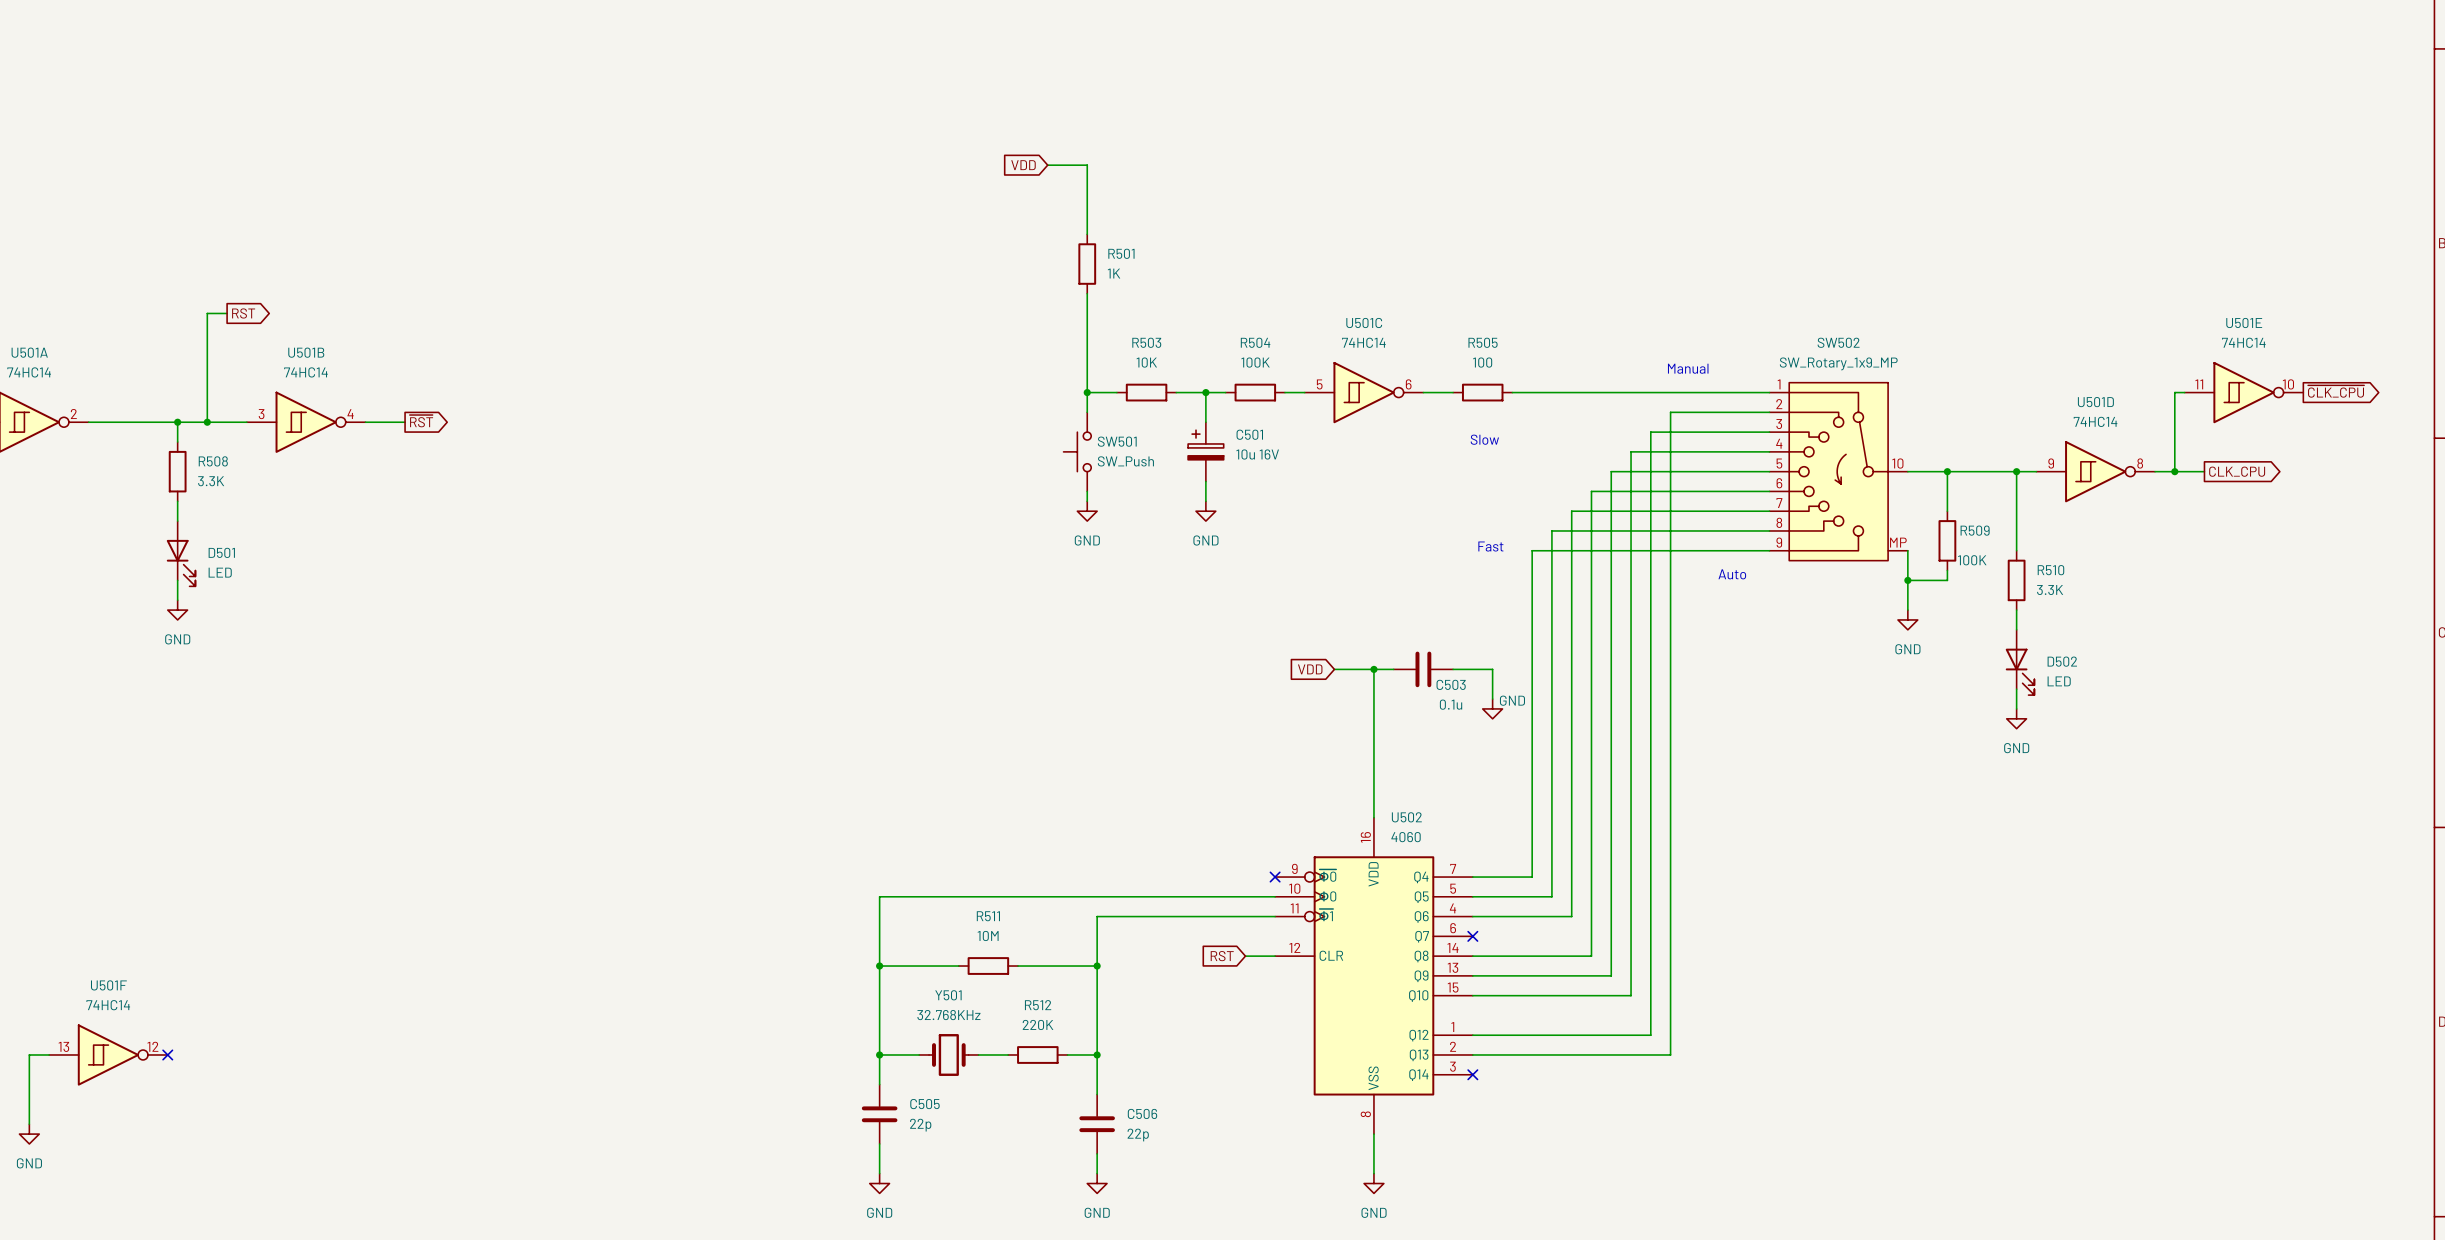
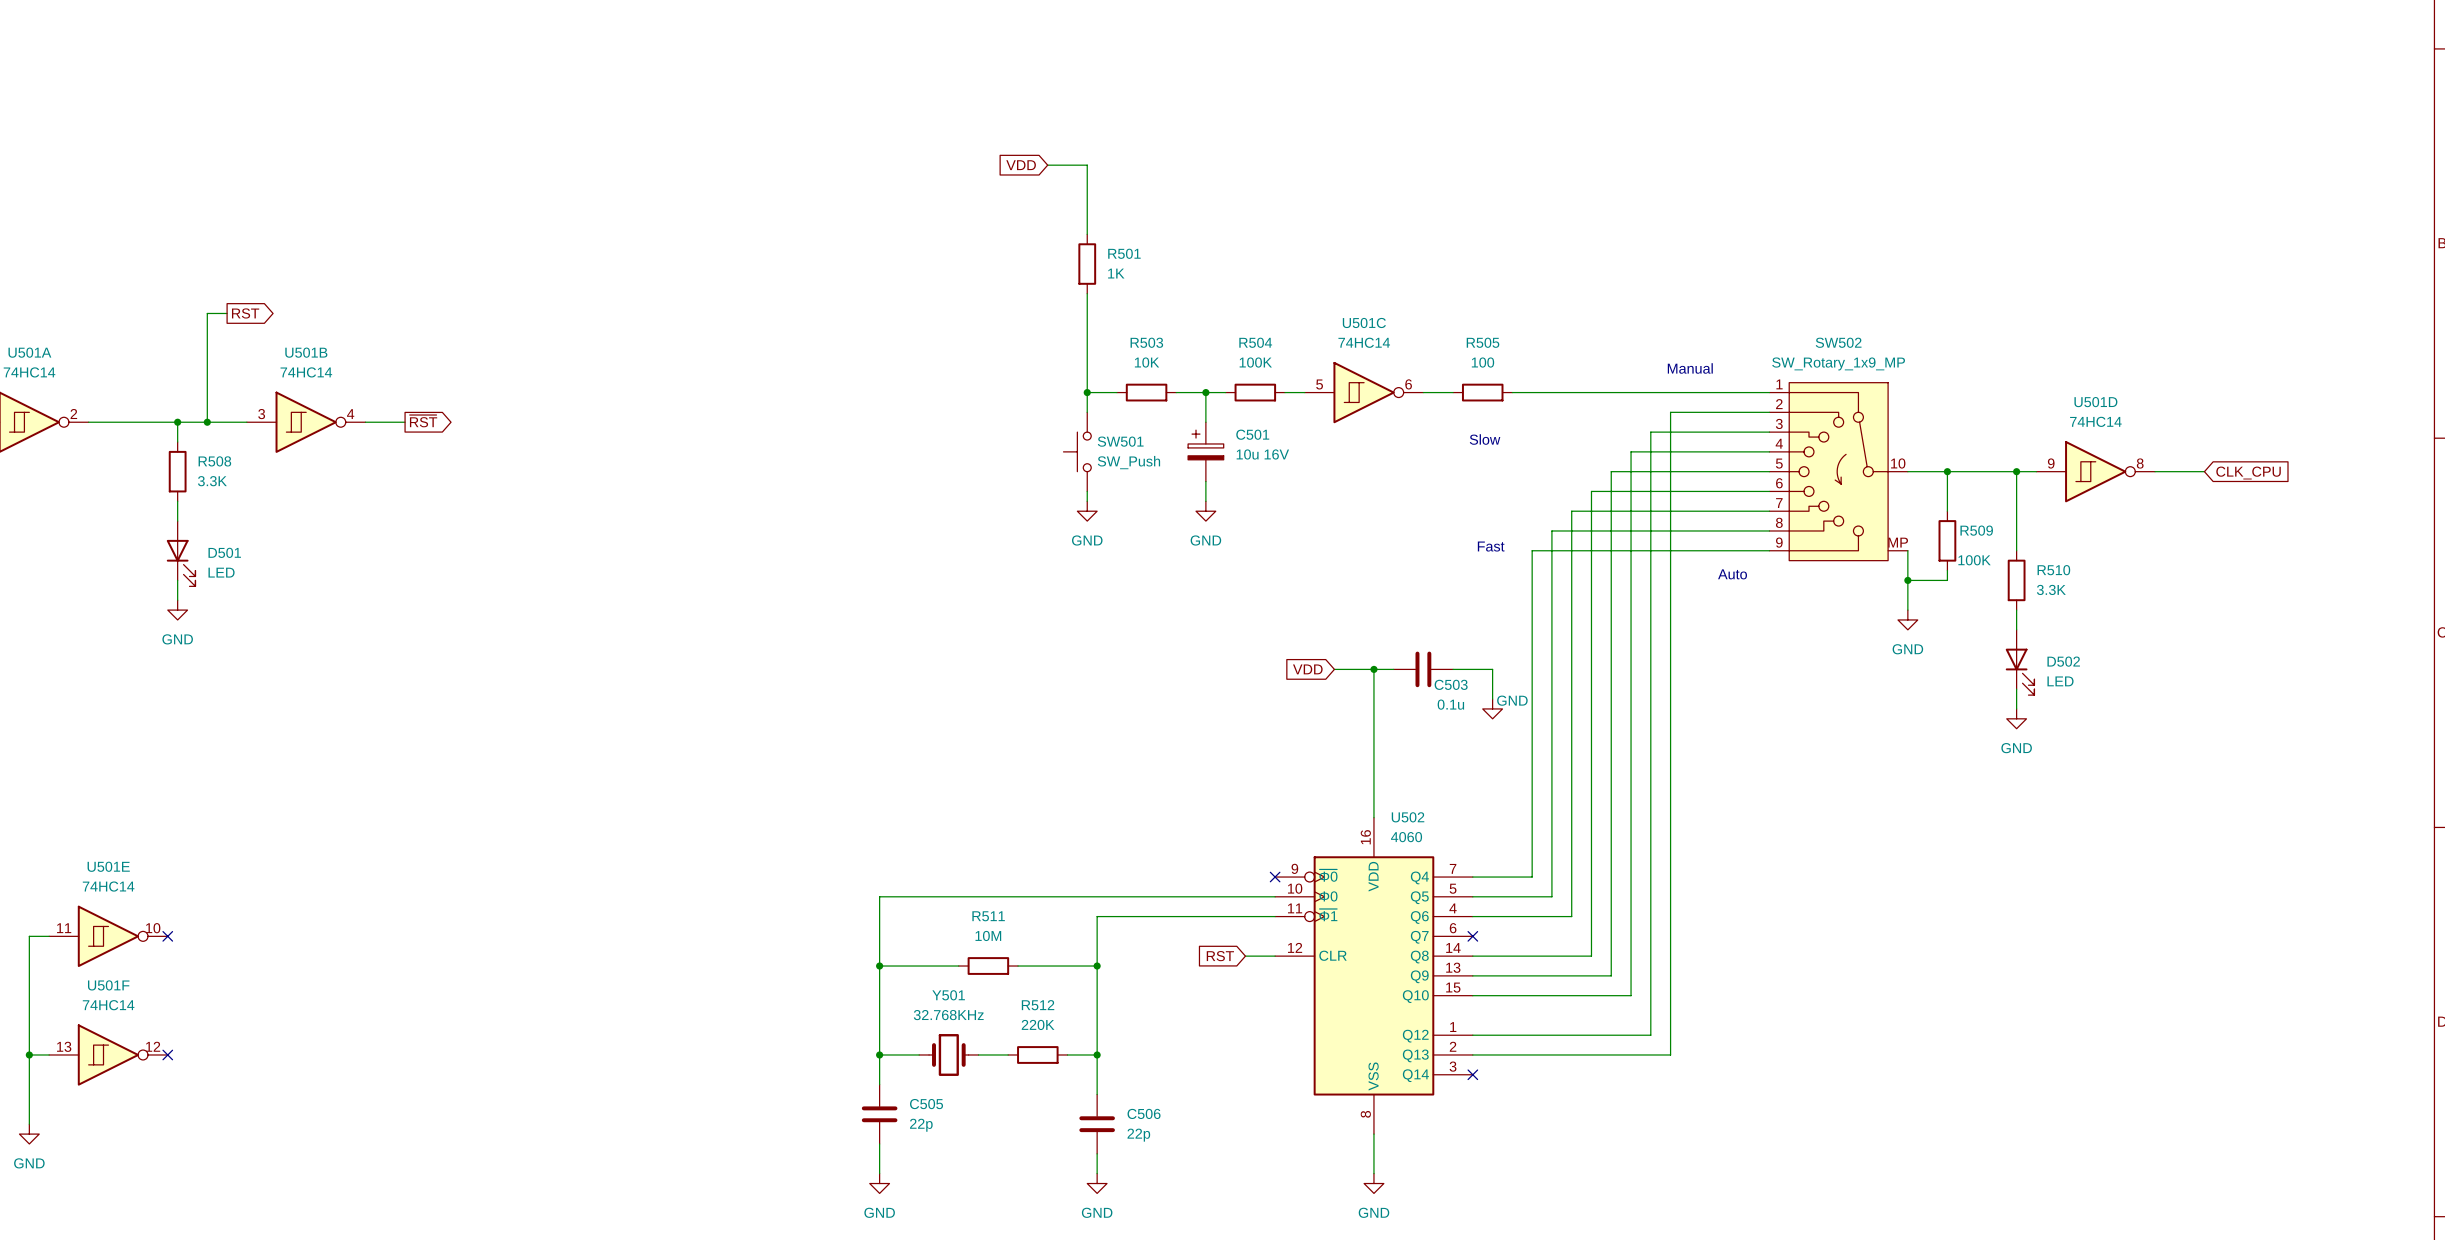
global label: ~{CLK_CPU} (2336, 391) -> none
wire: (2184, 392) (2174, 392) (2174, 471) -> none
U501E position: (2244, 392) -> (108, 936)
junction: (2174, 471) -> none
global label shape: output (2237, 471) -> input (2248, 473)
wire: none -> (49, 936) (29, 936) (29, 1054)
no-connect mark: none -> (167, 936)
junction: none -> (29, 1054)

